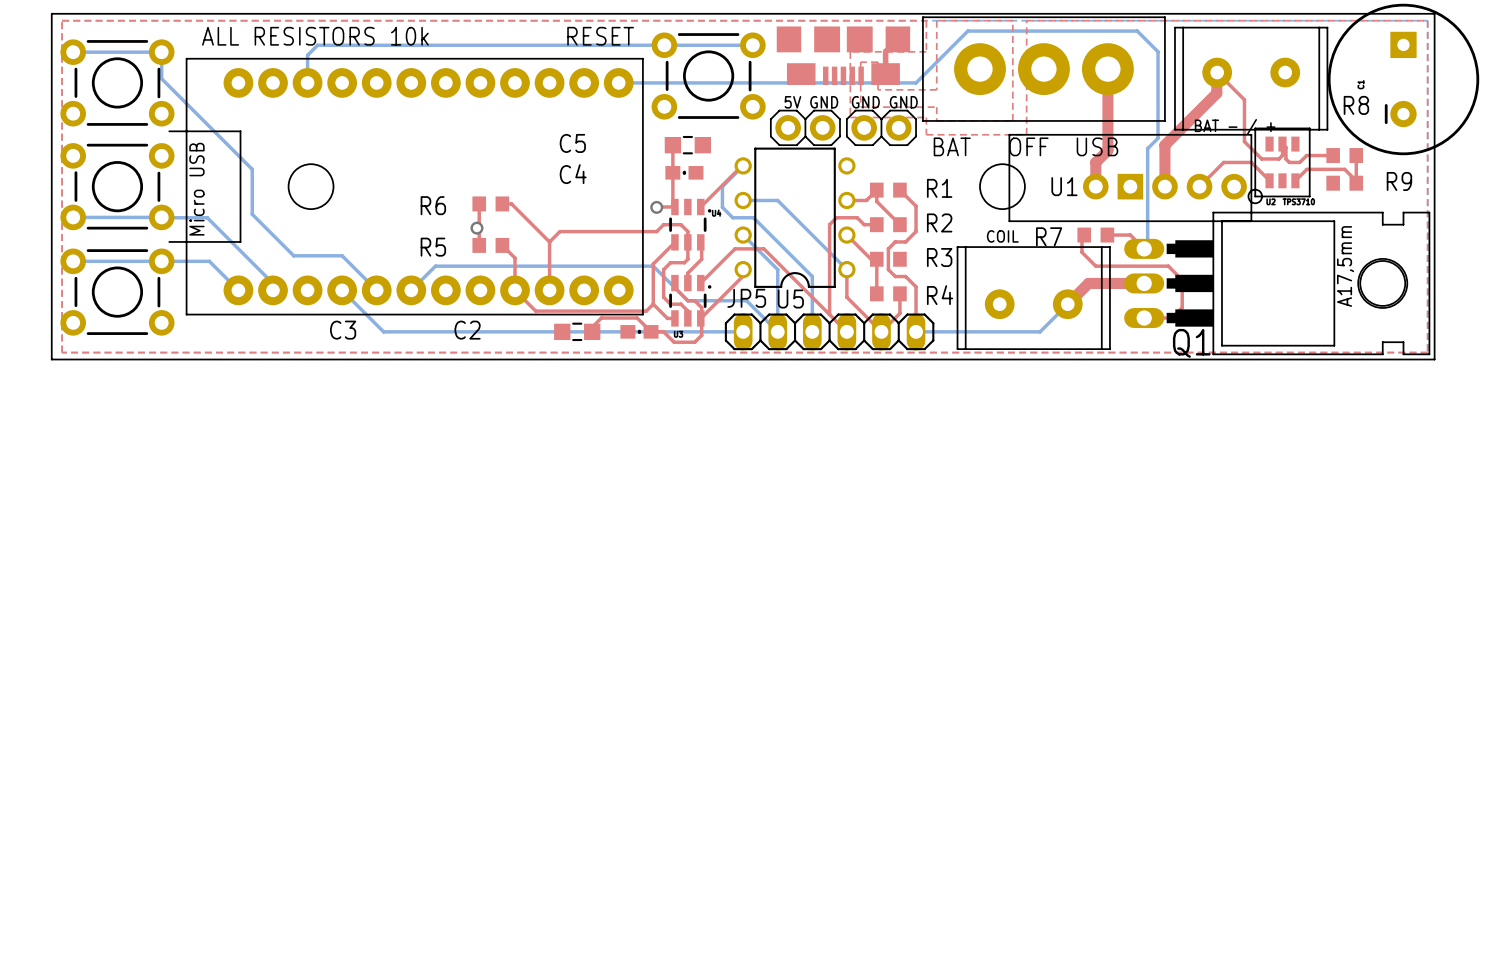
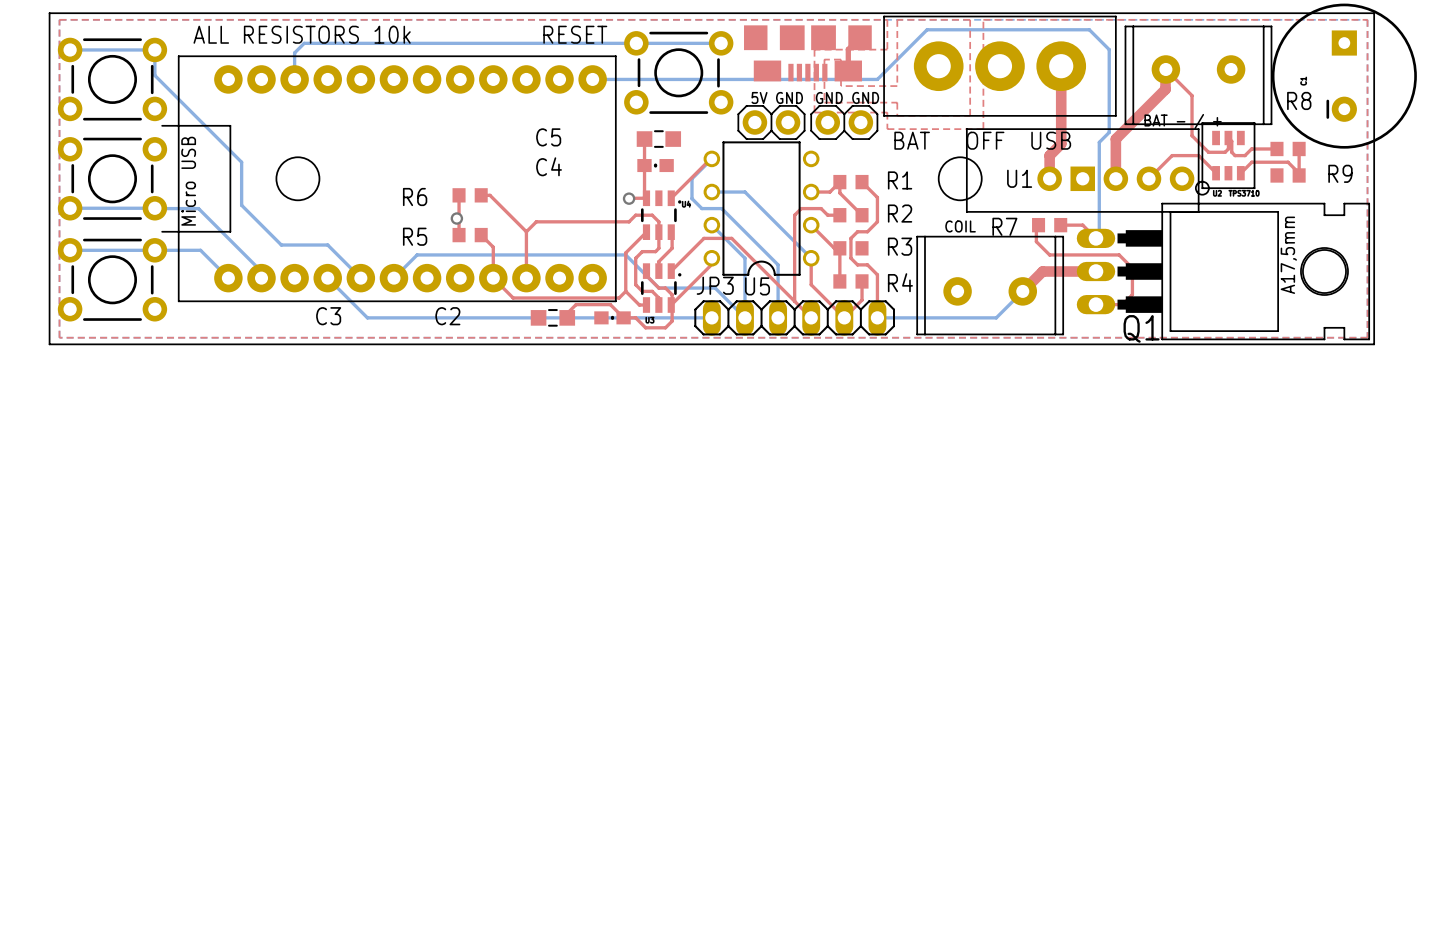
JP5 name: JP5 (746, 298) -> JP3 (715, 285)

